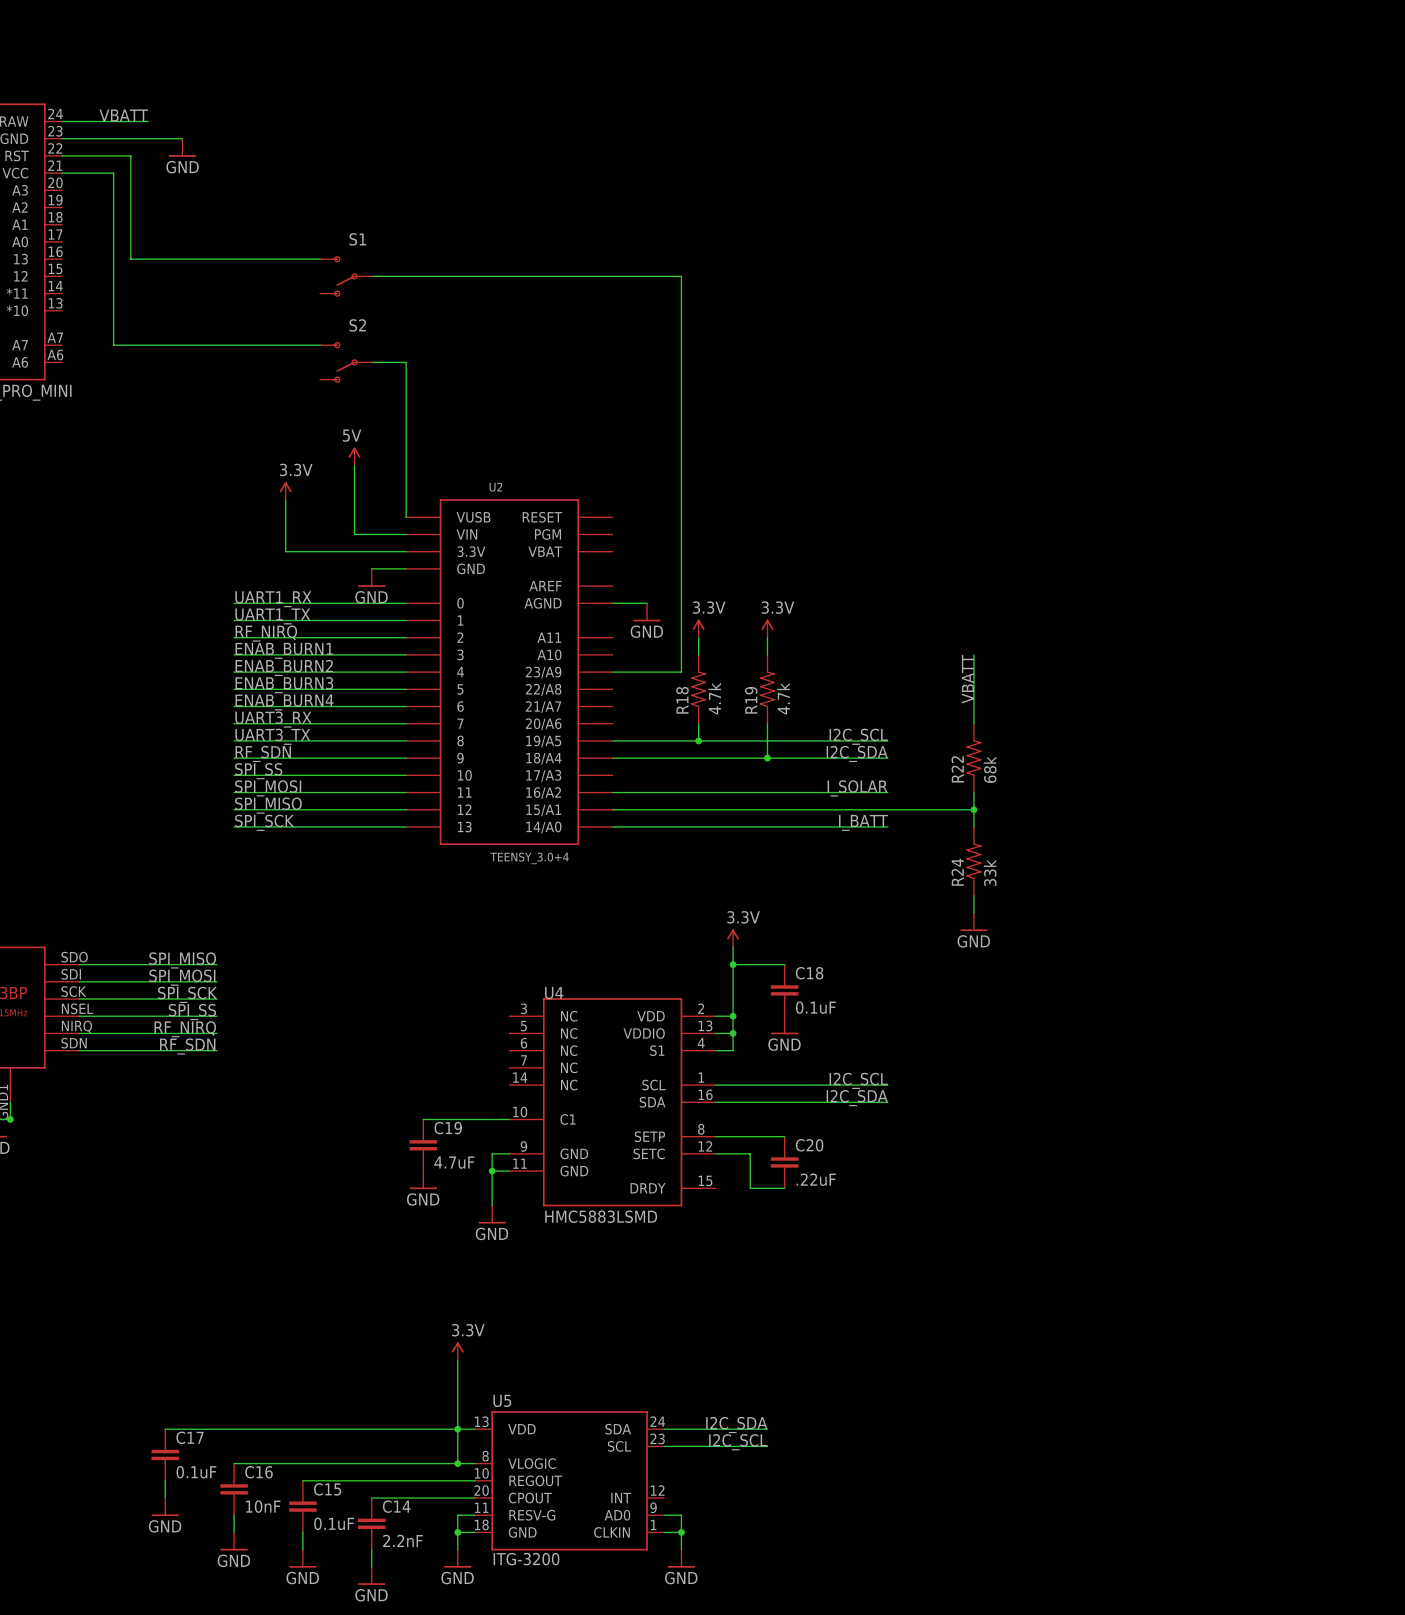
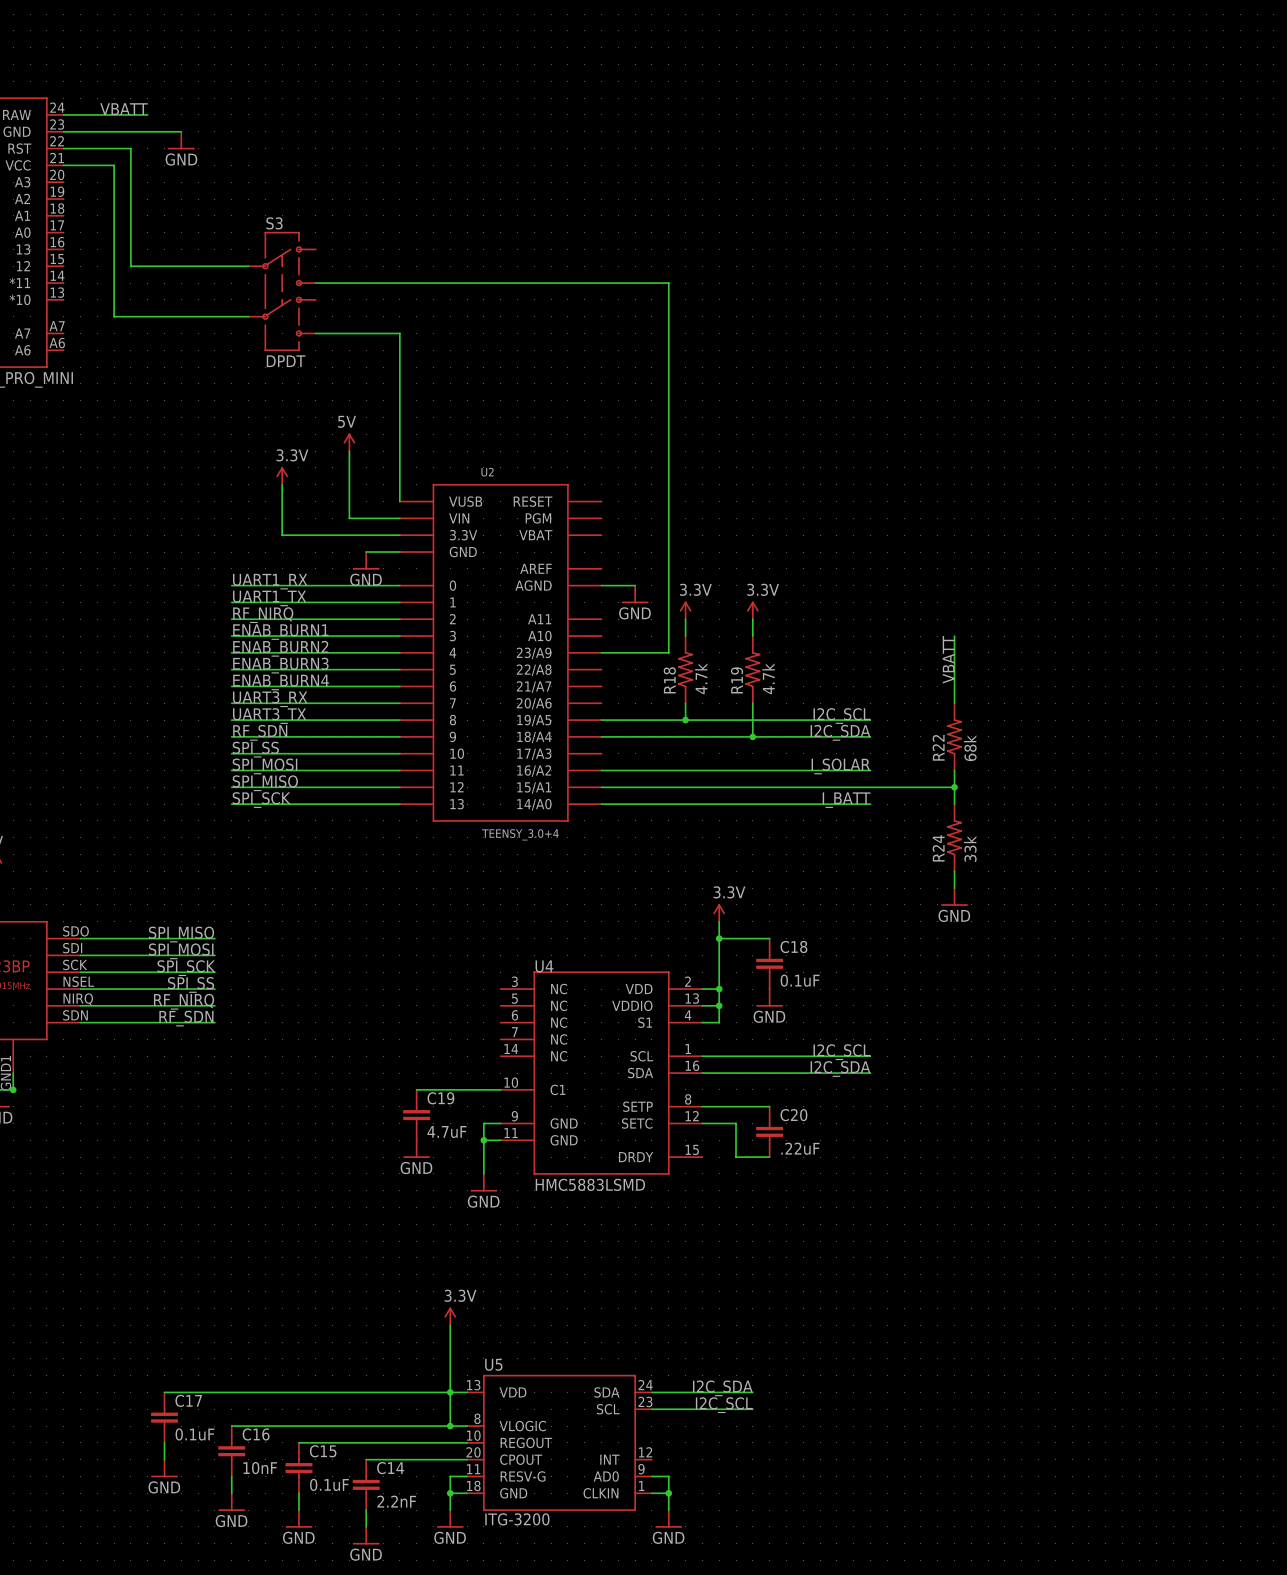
wire: (130, 259) (320, 259) -> (130, 249) (130, 266) (248, 266)
S1: (345, 276) -> none
wire: (371, 276) (681, 276) (681, 293) -> (315, 283) (668, 283)
S3: none -> DPDT (282, 291)
wire: (113, 327) (113, 345) (320, 345) -> (114, 316) (248, 316)
S2: (345, 362) -> none
wire: (371, 362) (406, 362) -> (315, 333) (399, 333) (399, 350)

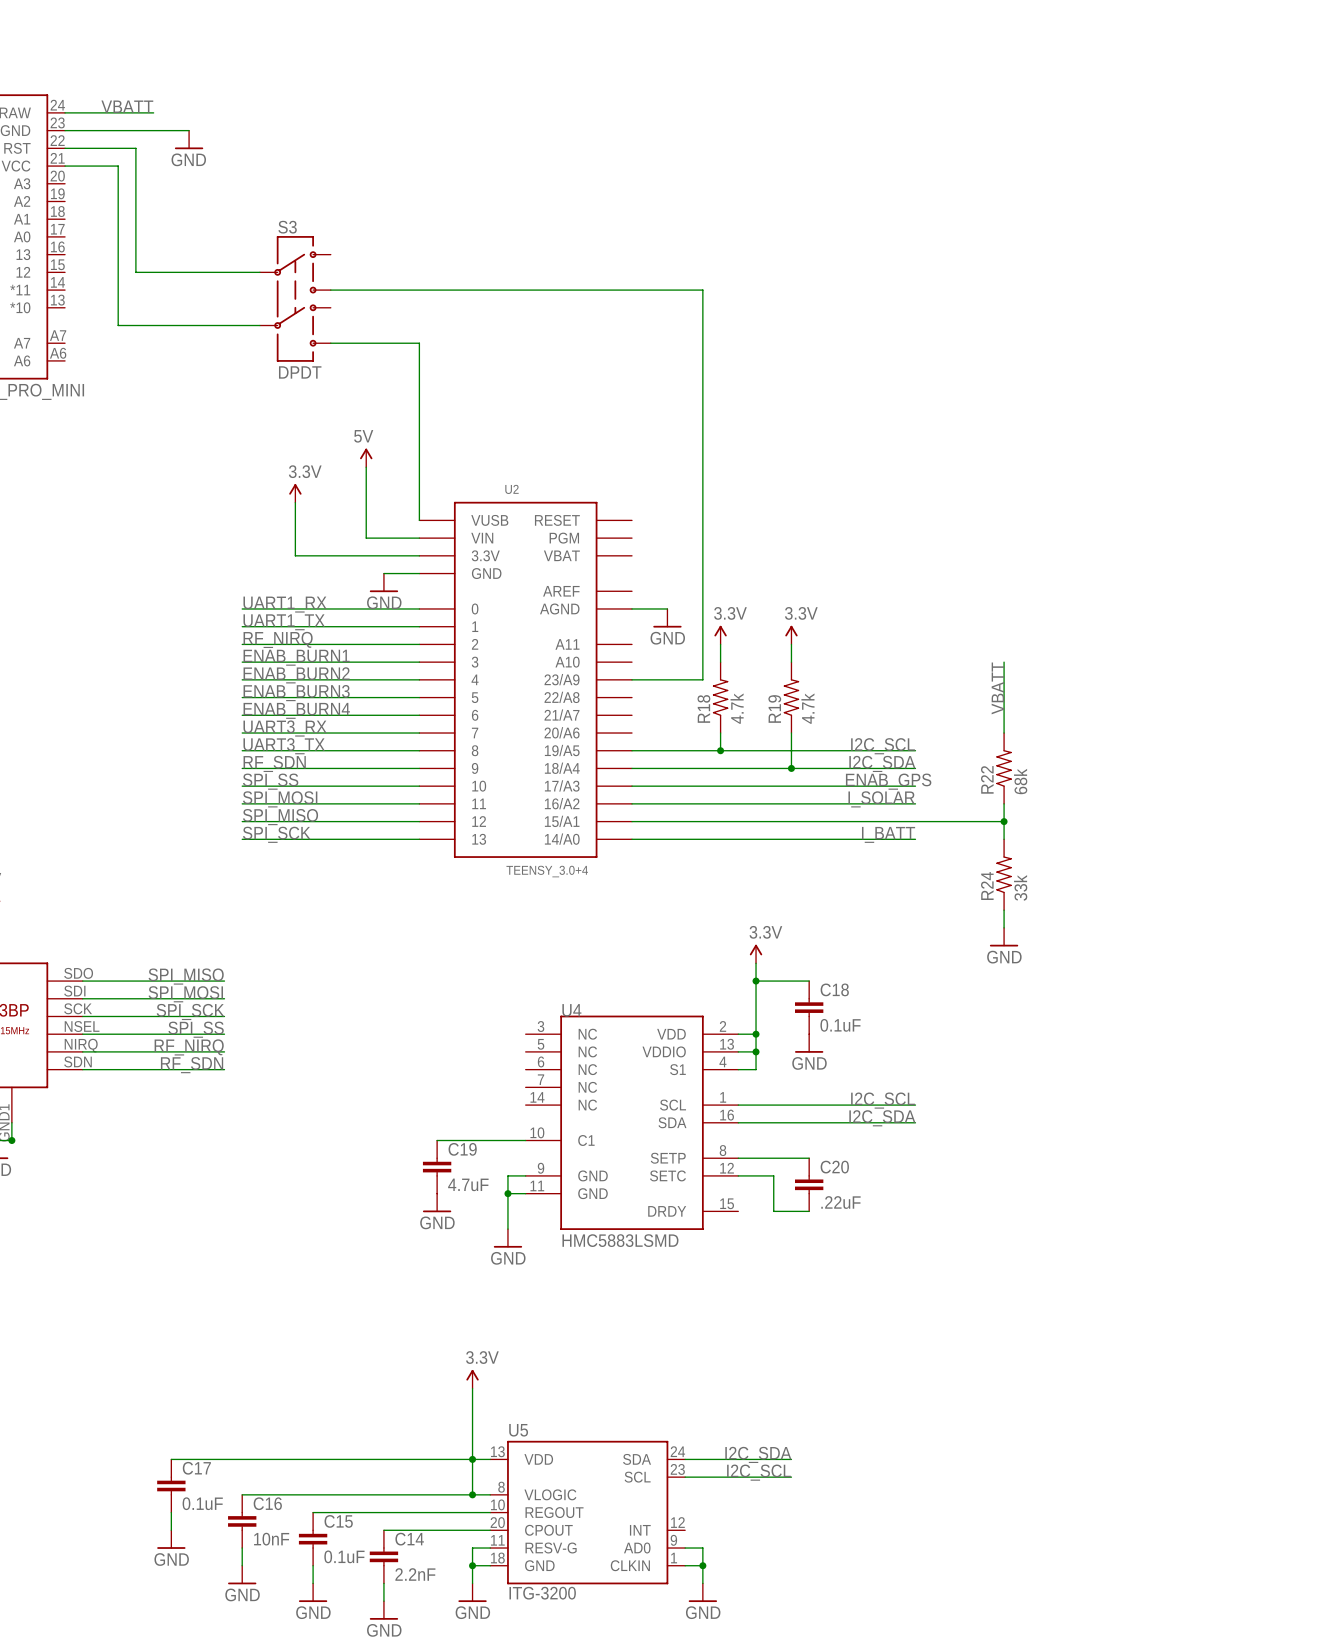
label: none -> ENAB_GPS (888, 781)
wire: none -> (631, 786) (915, 786)

